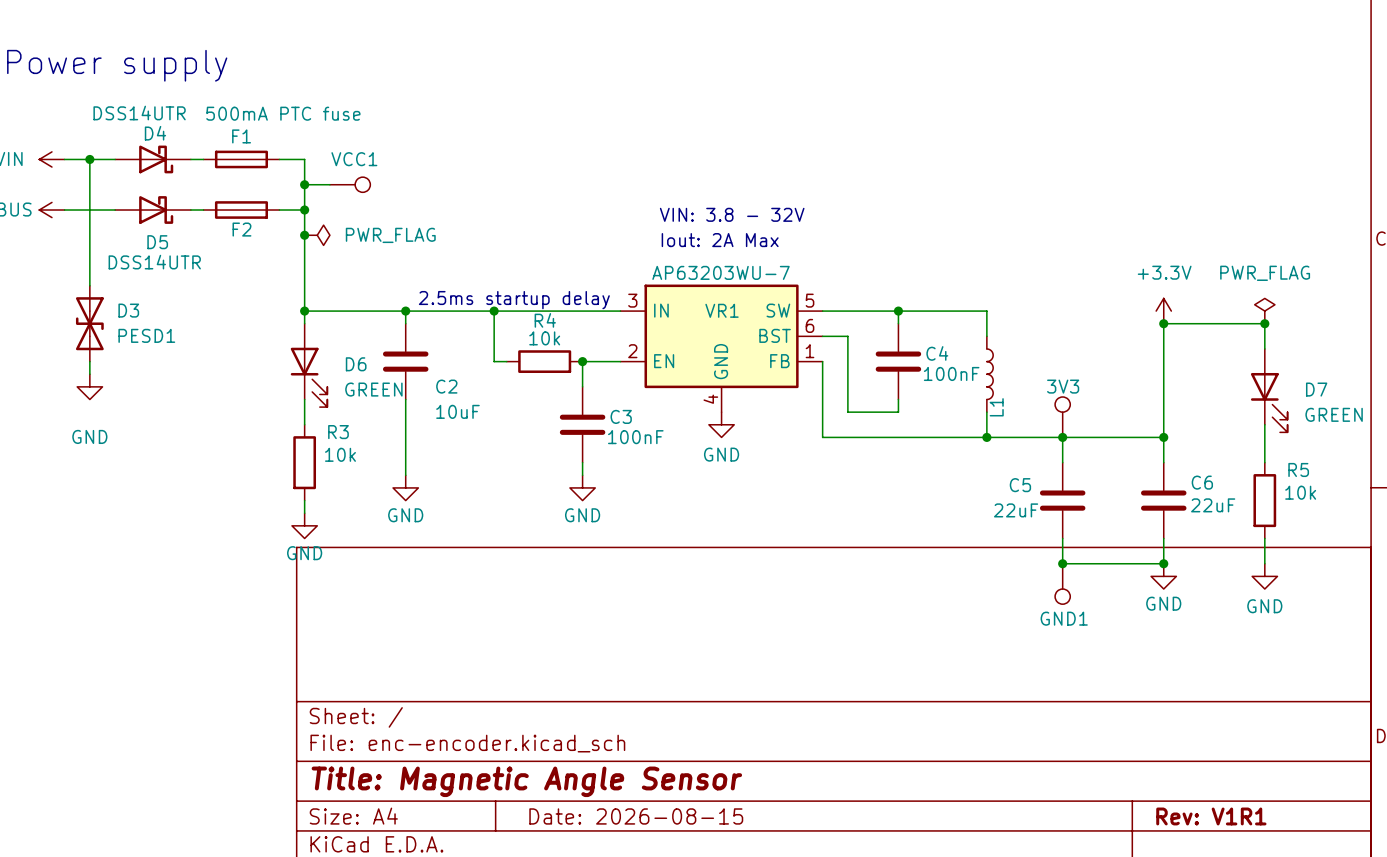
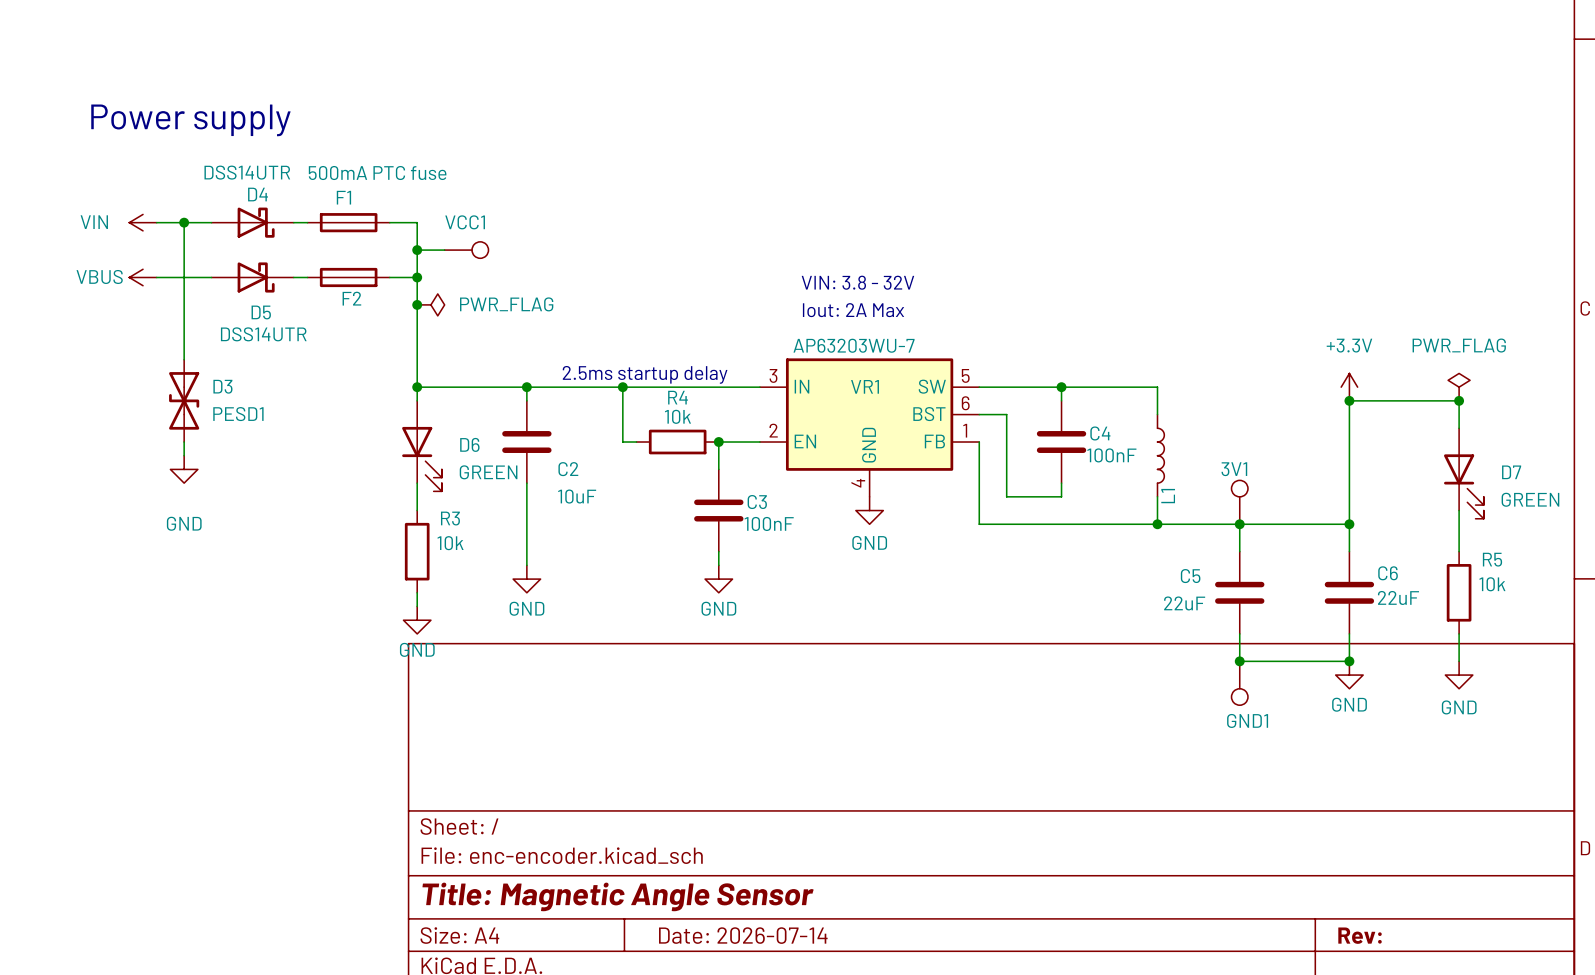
3V3 name: 3V3 (1063, 386) -> 3V1 (1234, 469)
title block: Date: 2026-08-15 (636, 816) -> Date: 2026-07-14 (743, 935)
title block: Rev: V1R1 (1211, 816) -> Rev: (1360, 935)

